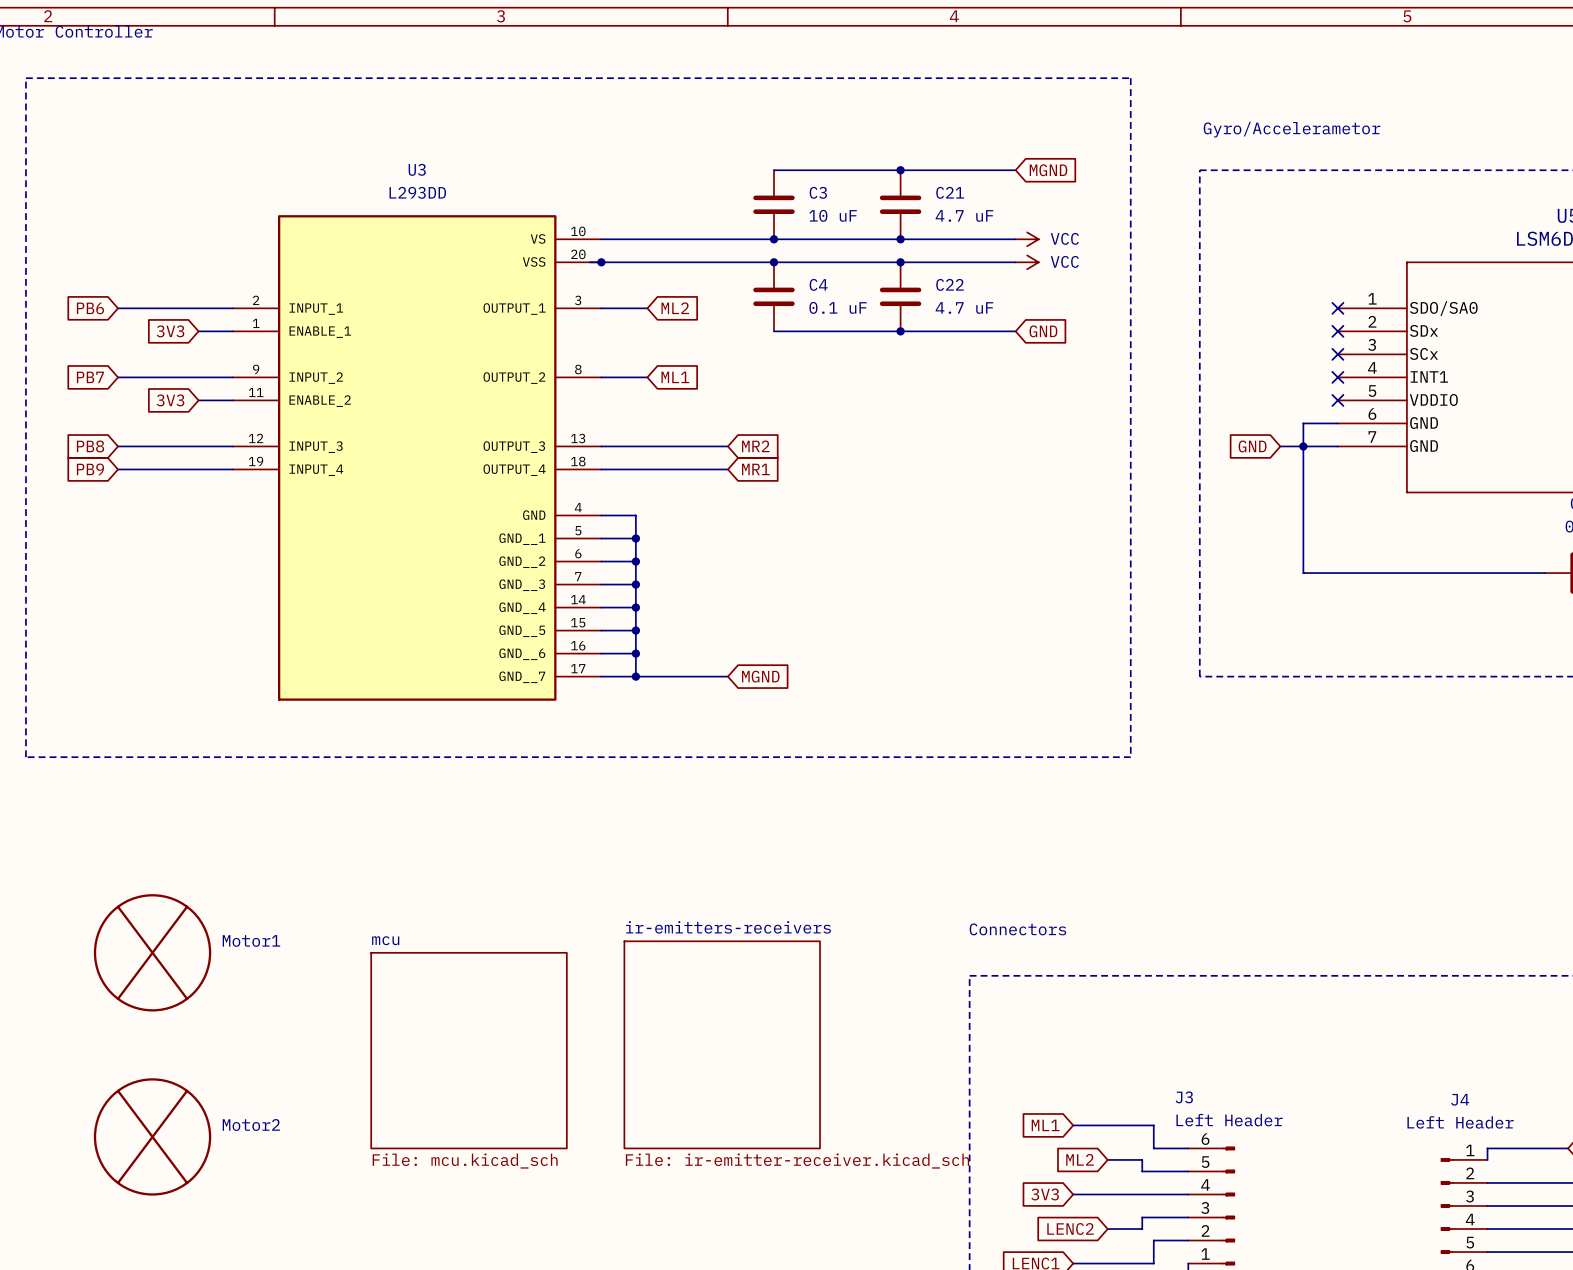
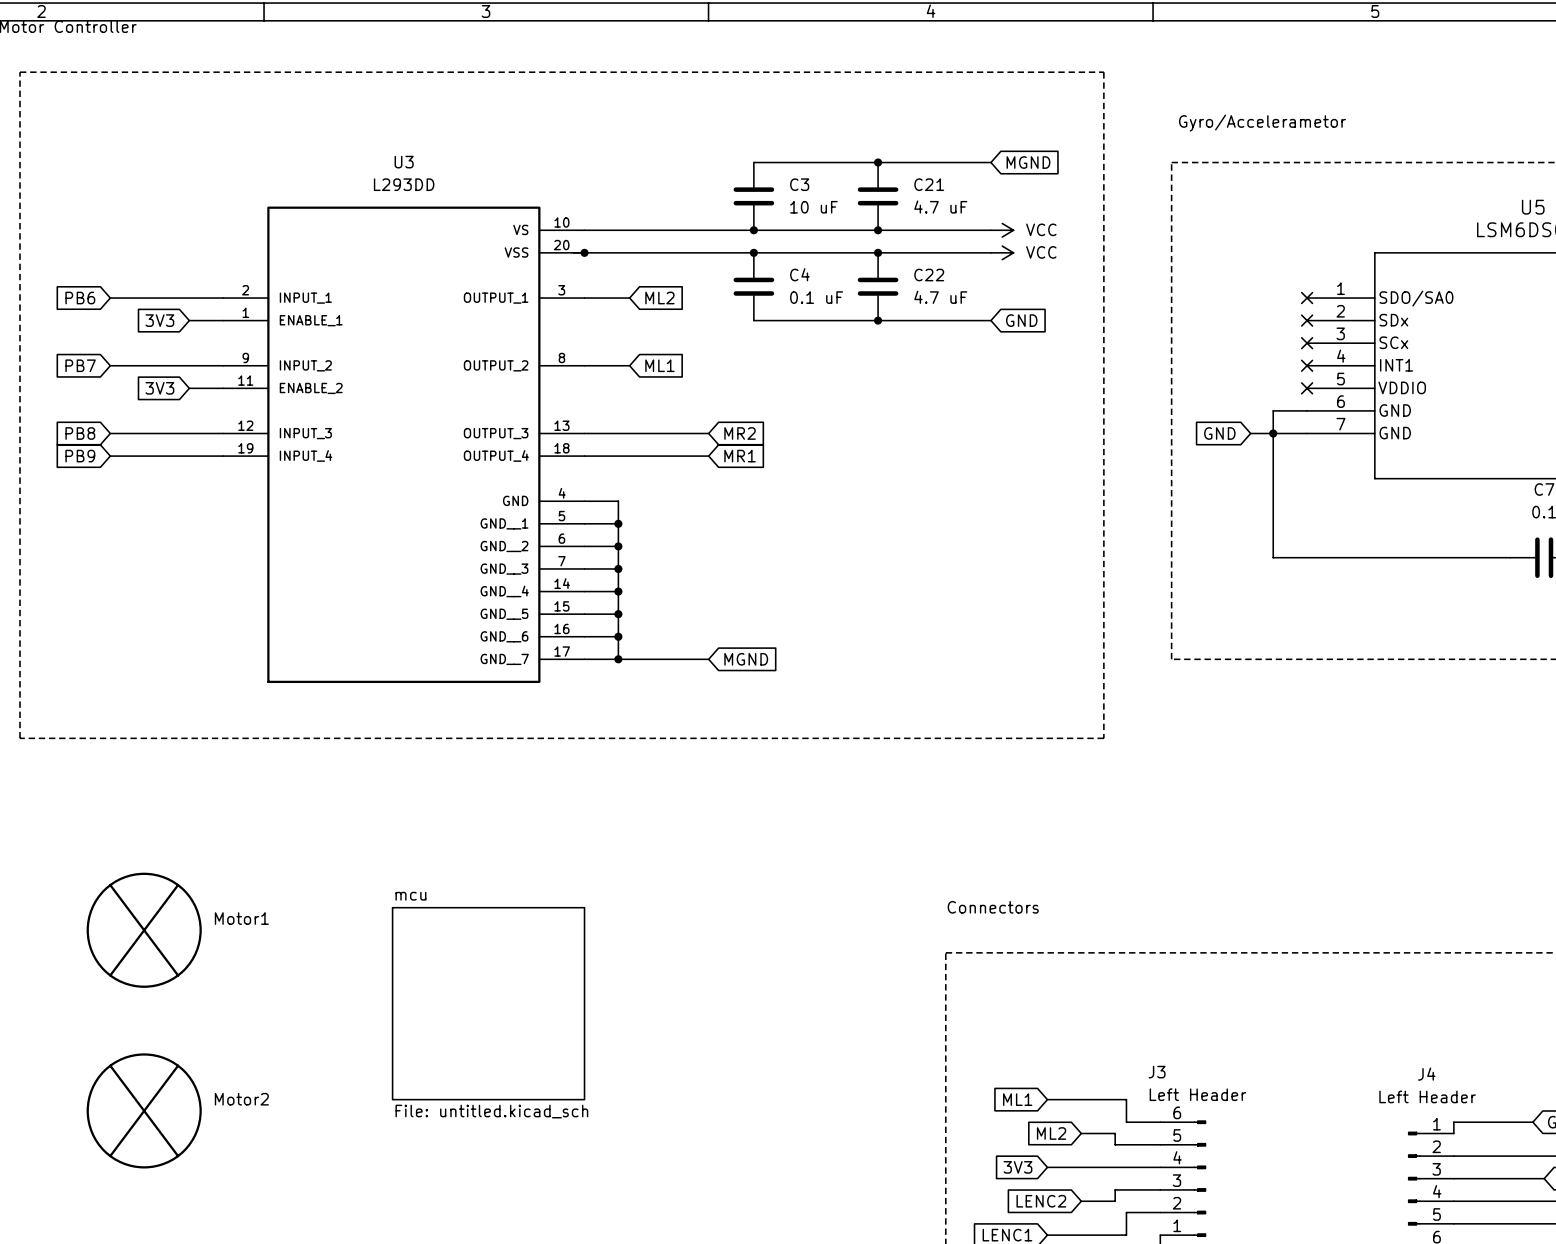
sheet mcu: none -> File: untitled.kicad_sch (488, 1003)
sheet ir-emitters-receivers: File: ir-emitter-receiver.kicad_sch (722, 1044) -> none
sheet mcu: File: mcu.kicad_sch (469, 1050) -> none

